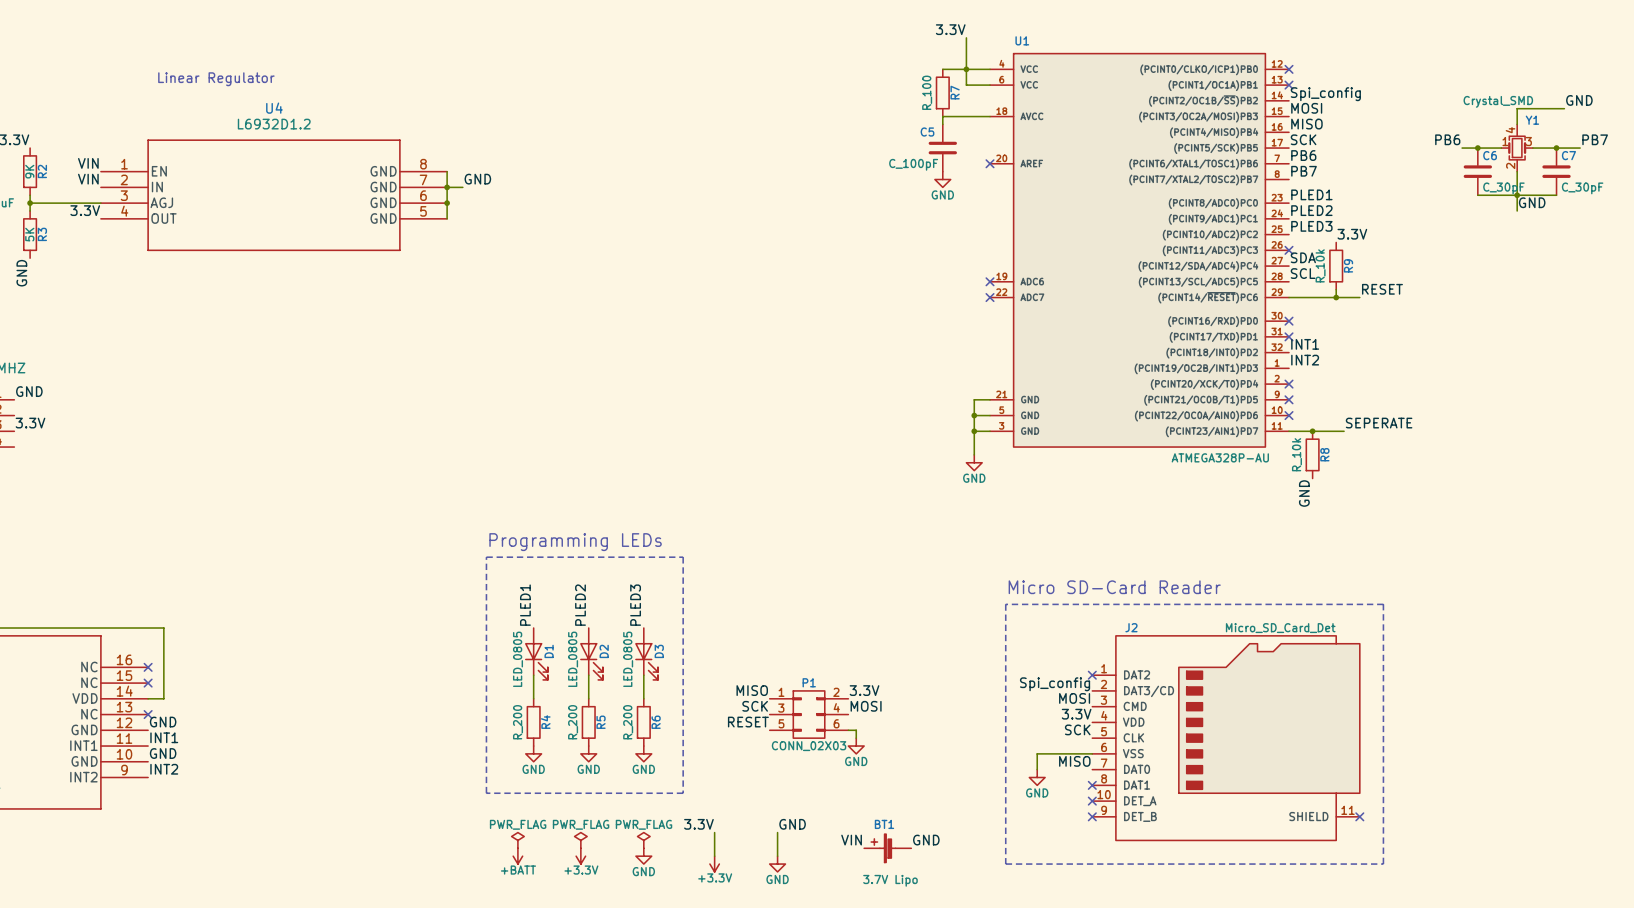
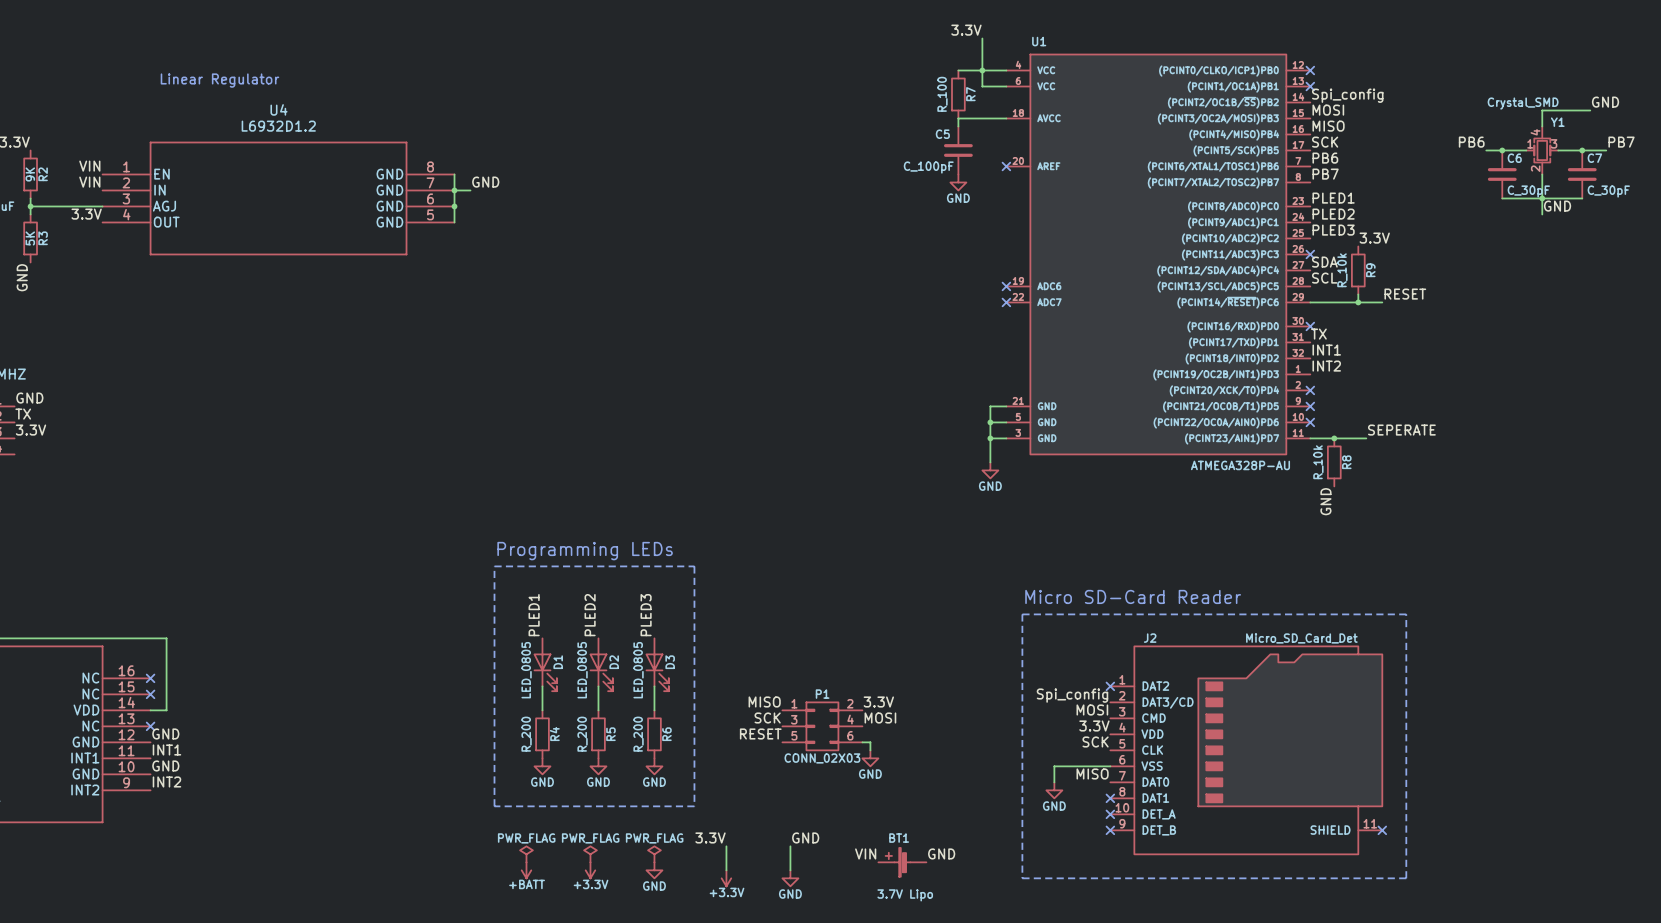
label: none -> TX (1318, 334)
no-connect mark: (1289, 336) -> none
label: none -> TX (23, 414)

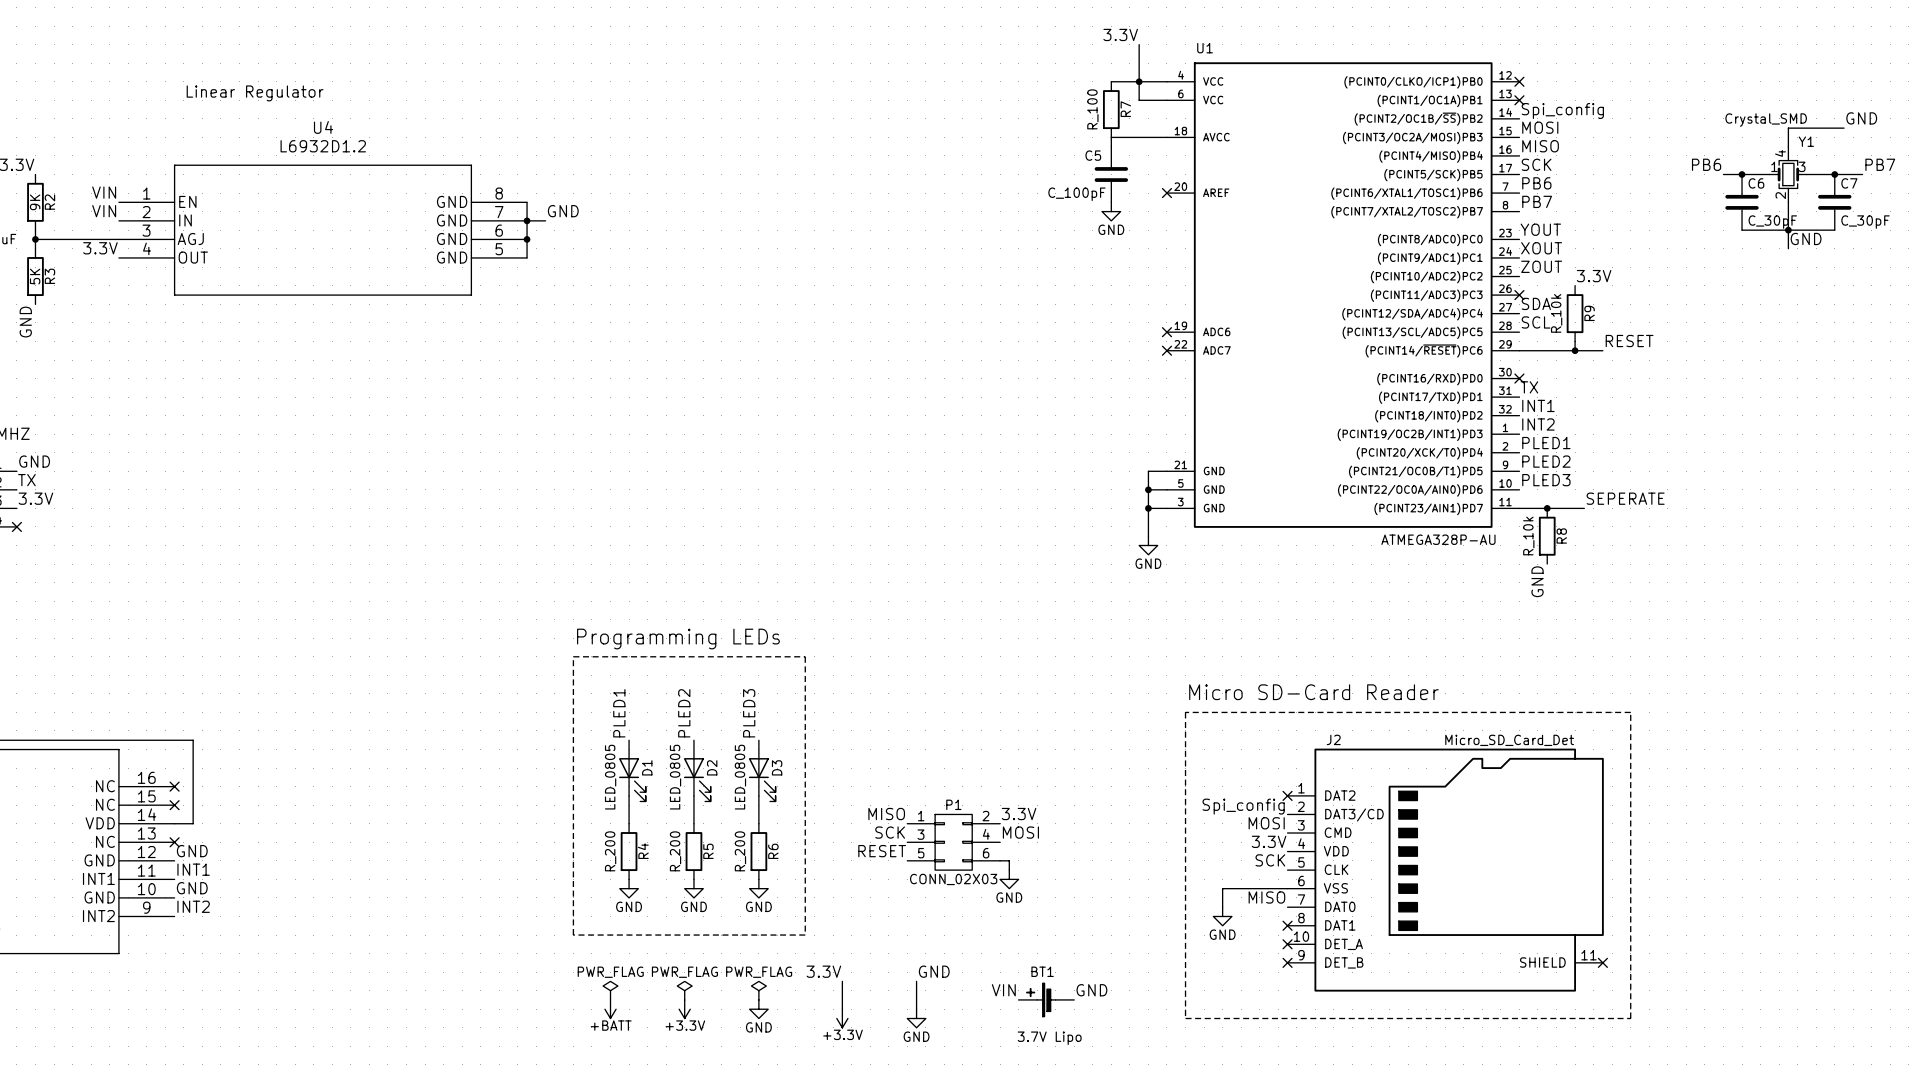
label: PLED1 (1333, 198) -> YOUT (1540, 229)
label: PLED2 (1333, 214) -> XOUT (1541, 248)
label: PLED3 (1333, 230) -> ZOUT (1541, 266)
label: none -> PLED1 (1546, 443)
no-connect mark: (1310, 390) -> none
label: none -> PLED2 (1546, 461)
no-connect mark: (1310, 406) -> none
label: none -> PLED3 (1546, 480)
no-connect mark: (1310, 422) -> none
no-connect mark: none -> (16, 526)

